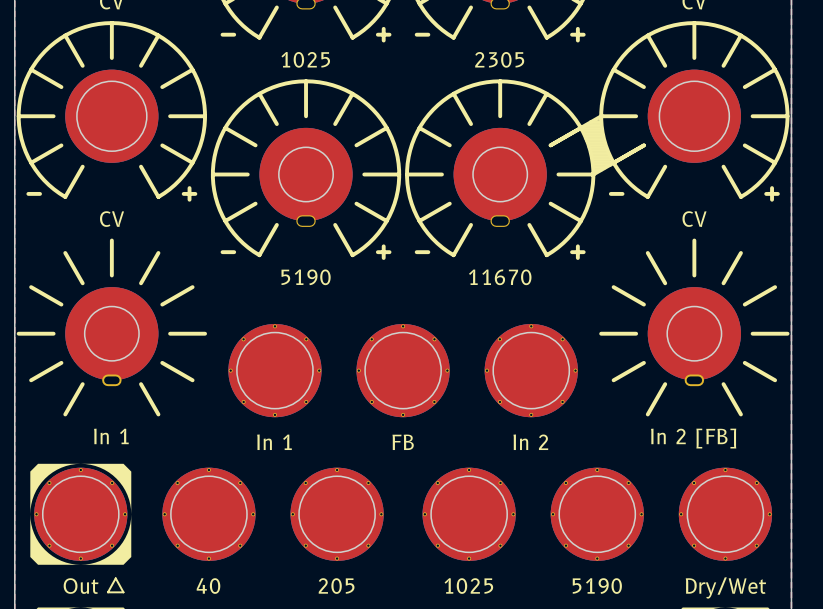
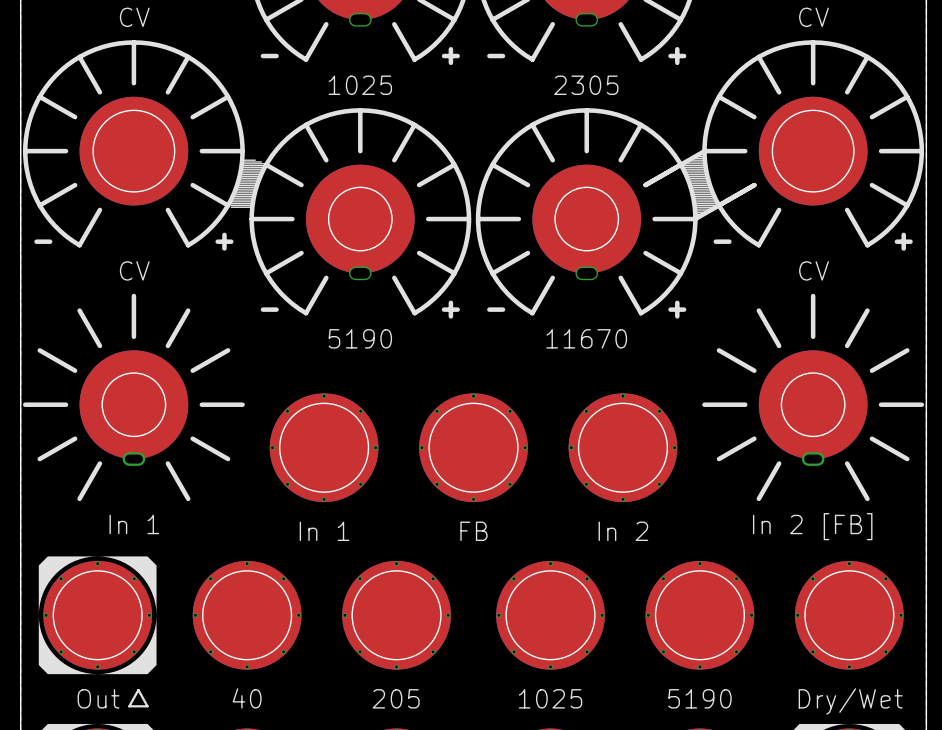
line: none -> (241, 160) (255, 160)
line: none -> (241, 161) (261, 161)
line: none -> (241, 163) (265, 163)
line: none -> (241, 165) (265, 165)
line: none -> (241, 167) (265, 167)
line: none -> (241, 169) (262, 169)
line: none -> (241, 171) (262, 171)
line: none -> (241, 172) (262, 172)
line: none -> (241, 174) (262, 174)
line: none -> (241, 176) (262, 176)
line: none -> (240, 178) (261, 178)
line: none -> (239, 180) (260, 180)
line: none -> (238, 181) (259, 181)
line: none -> (237, 183) (258, 183)
line: none -> (236, 185) (257, 185)
line: none -> (236, 187) (257, 187)
line: none -> (235, 189) (256, 189)
line: none -> (234, 190) (255, 190)
line: none -> (234, 192) (255, 192)
line: none -> (233, 194) (254, 194)
line: none -> (233, 196) (253, 196)
line: none -> (232, 198) (253, 198)
line: none -> (232, 200) (253, 200)
line: none -> (232, 201) (253, 201)
line: none -> (231, 203) (252, 203)
line: none -> (231, 205) (252, 205)
line: none -> (231, 207) (252, 207)

